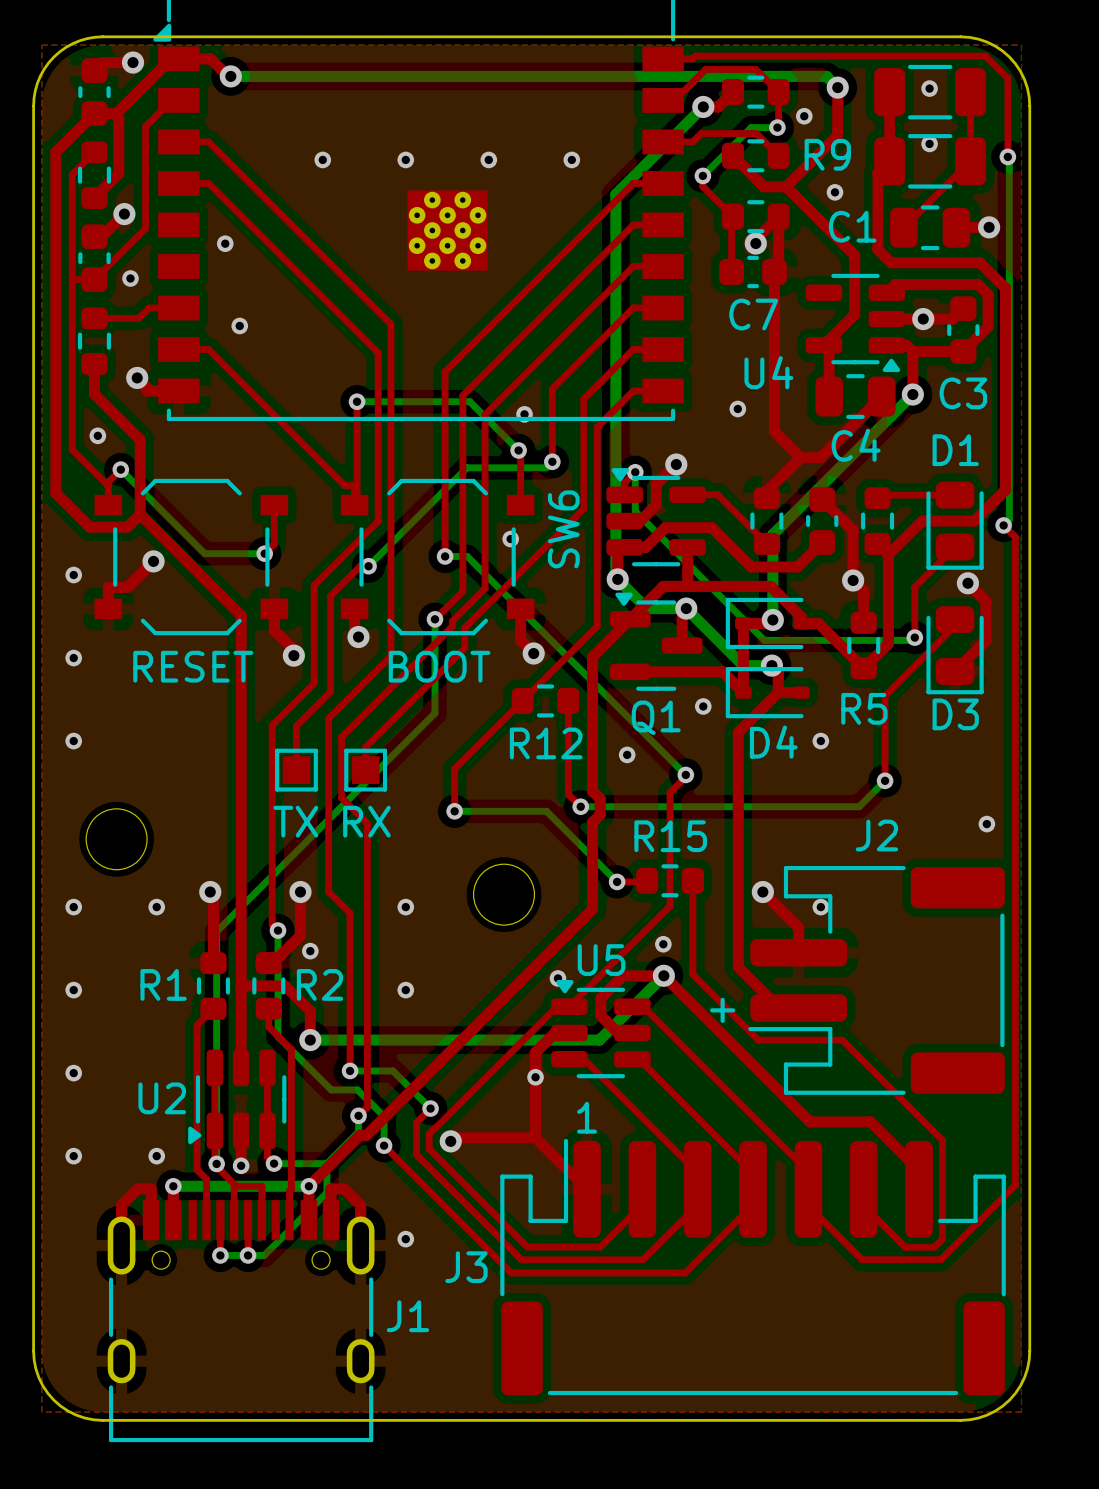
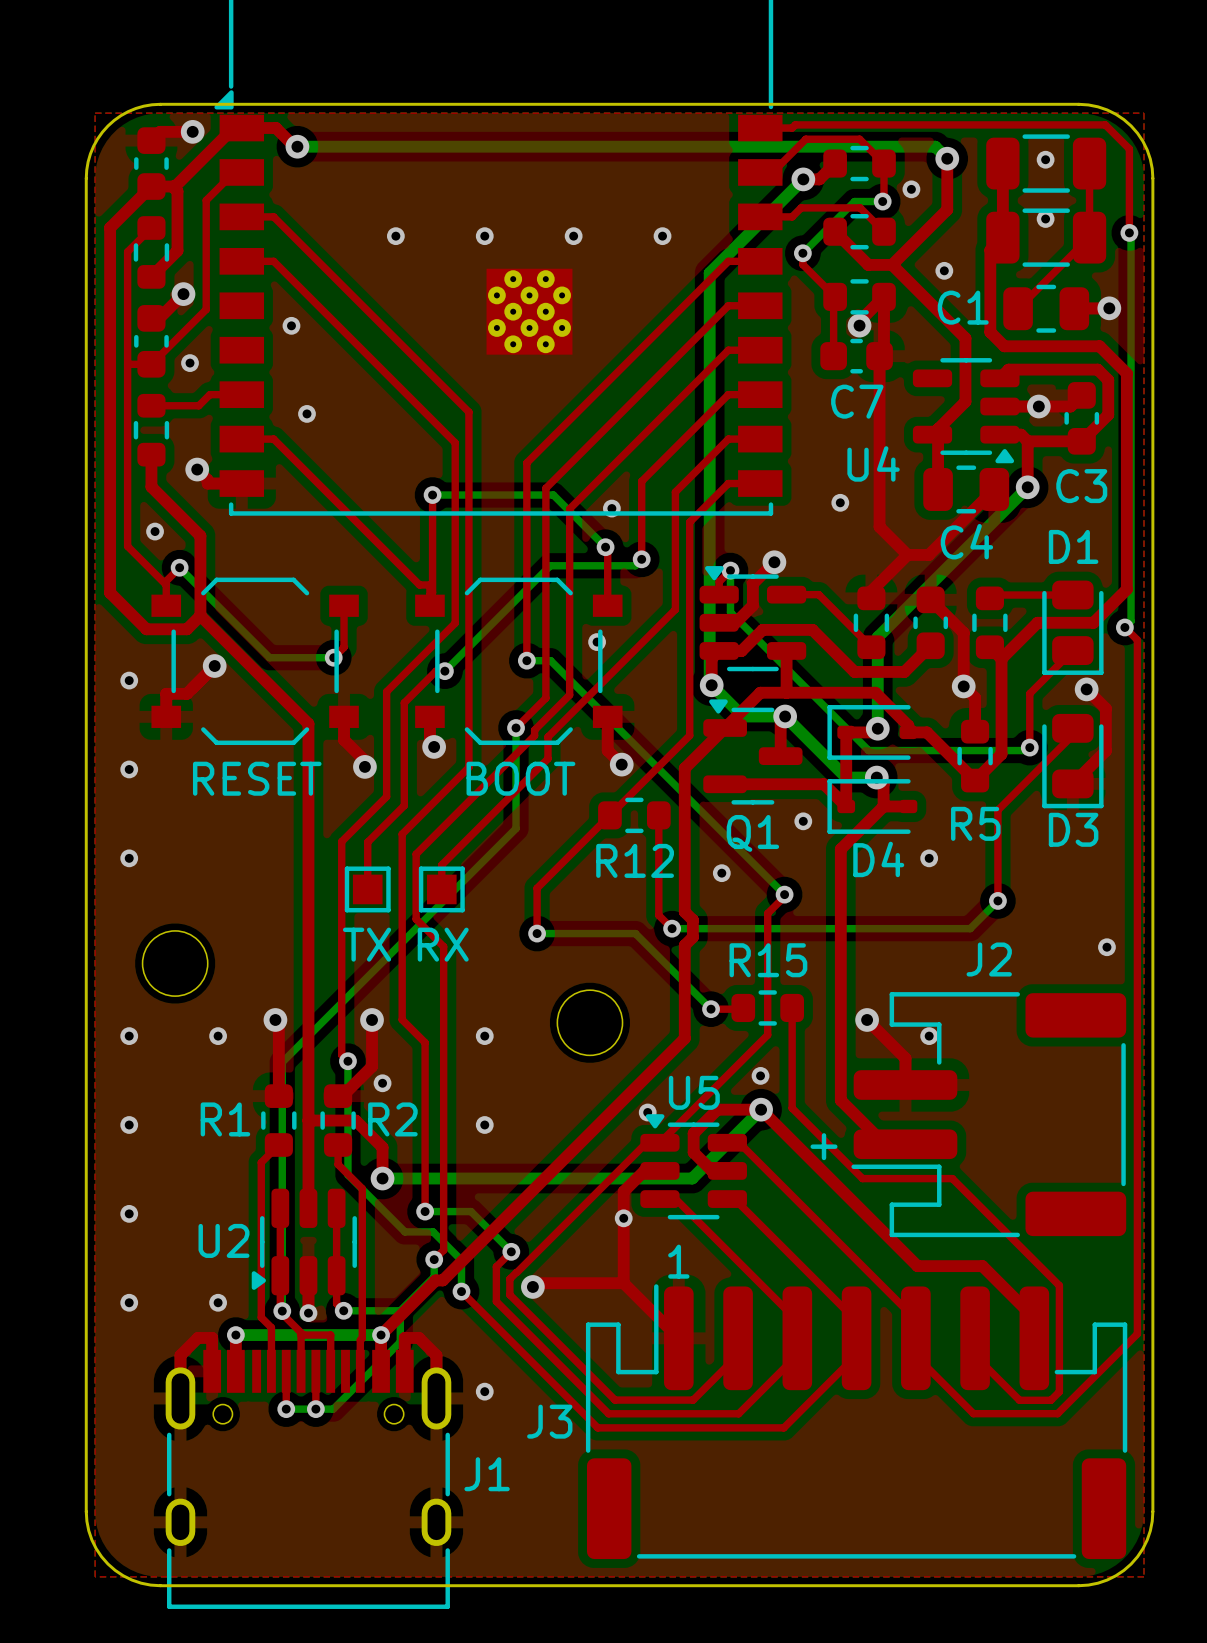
R9 name: R9 (827, 154) -> none
SW6 name: SW6 (563, 529) -> none

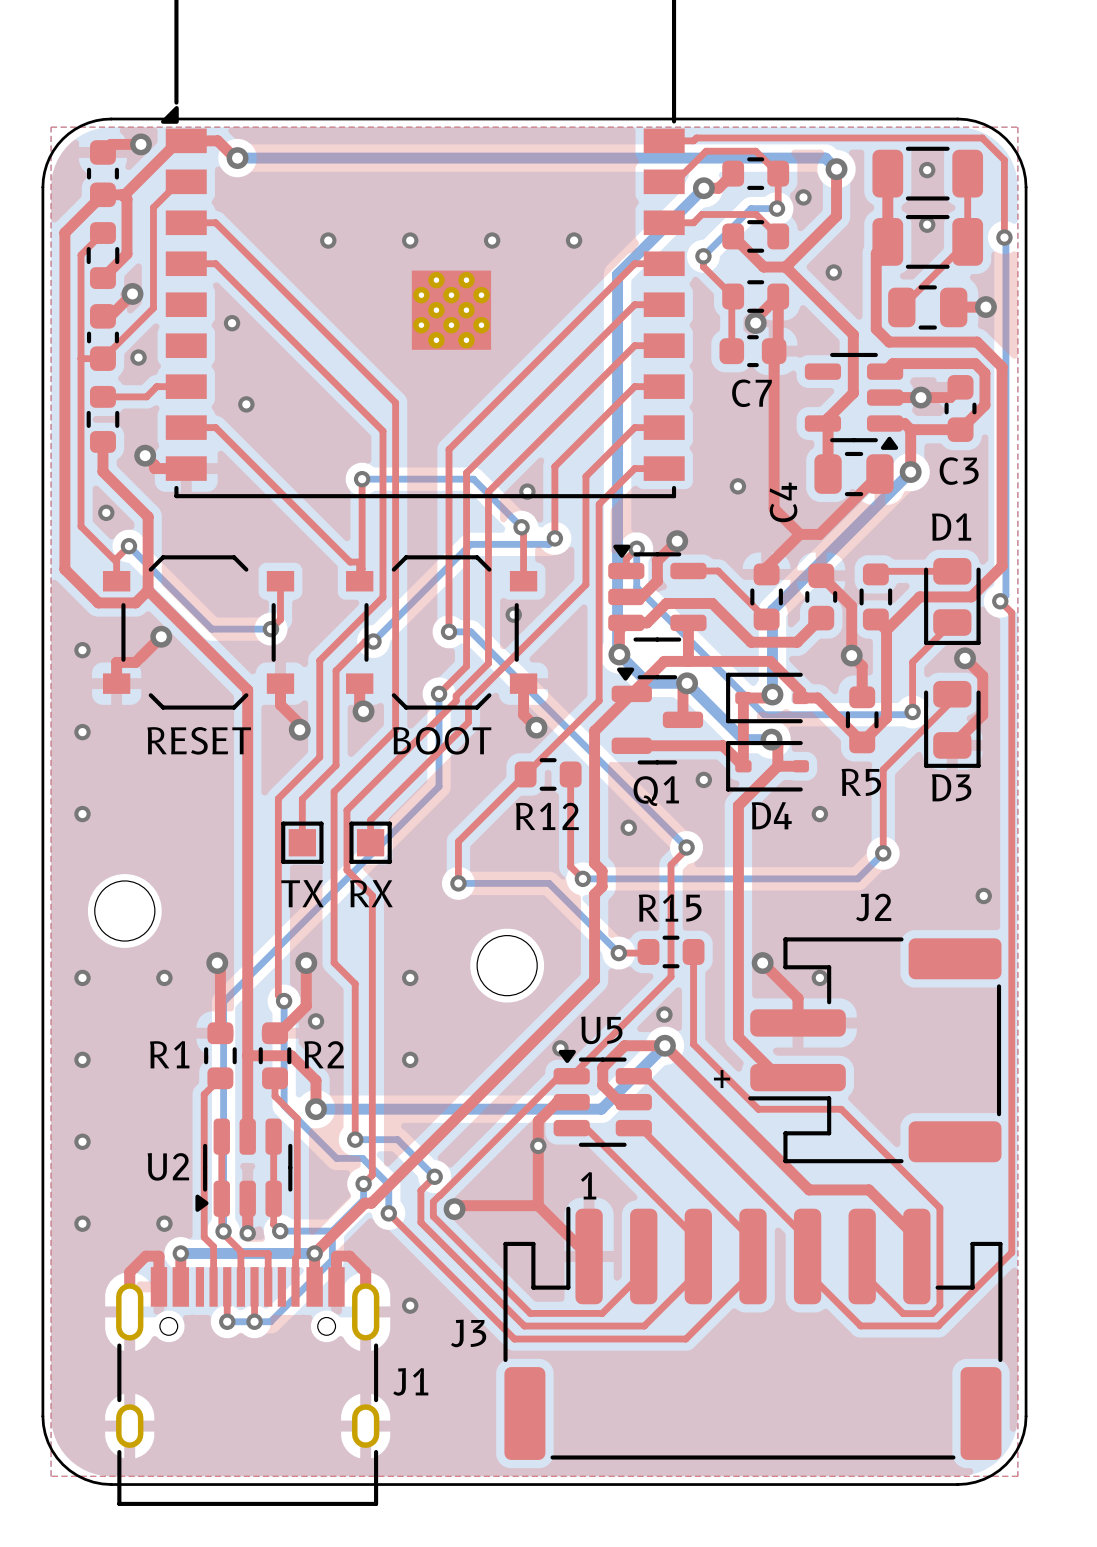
C1 name: C1 (963, 307) -> none
U4 name: U4 (873, 463) -> none
C4 name rotation: 0° (966, 541) -> 90° counterclockwise (783, 502)
C4 name position: C4 (966, 541) -> C4 (783, 502)

